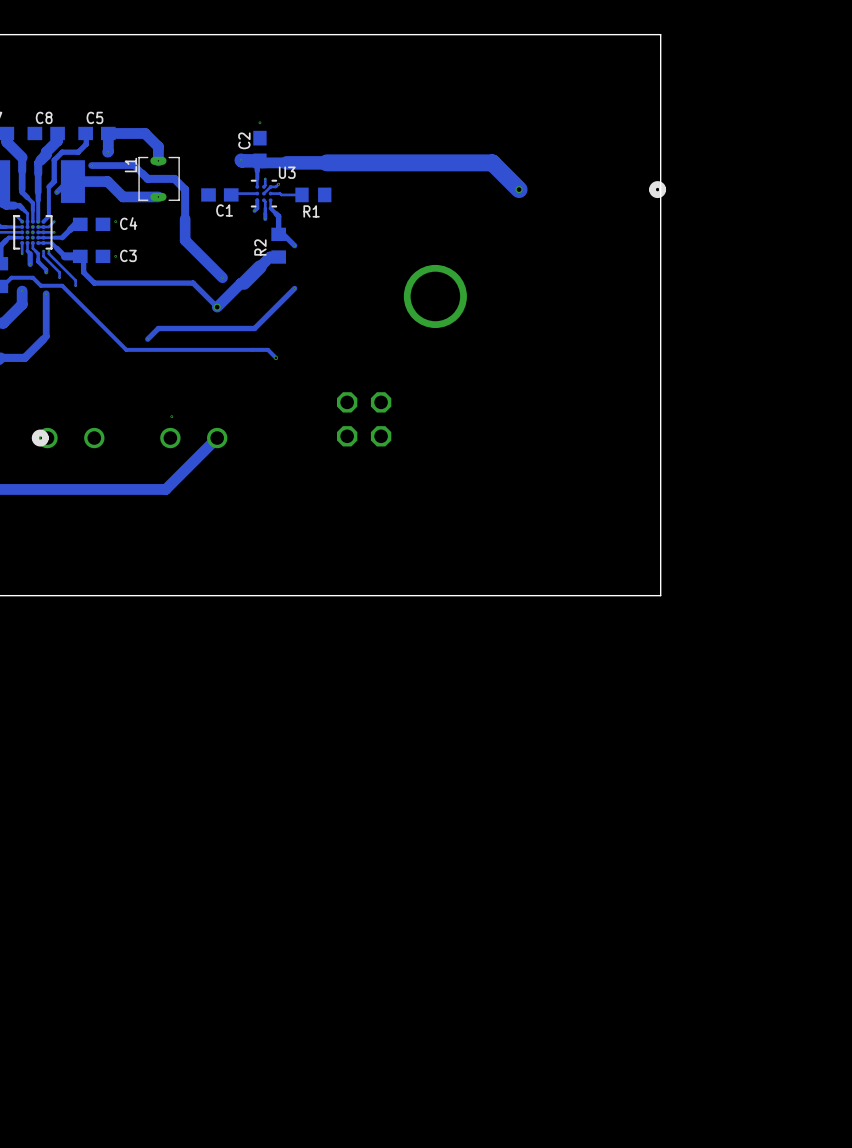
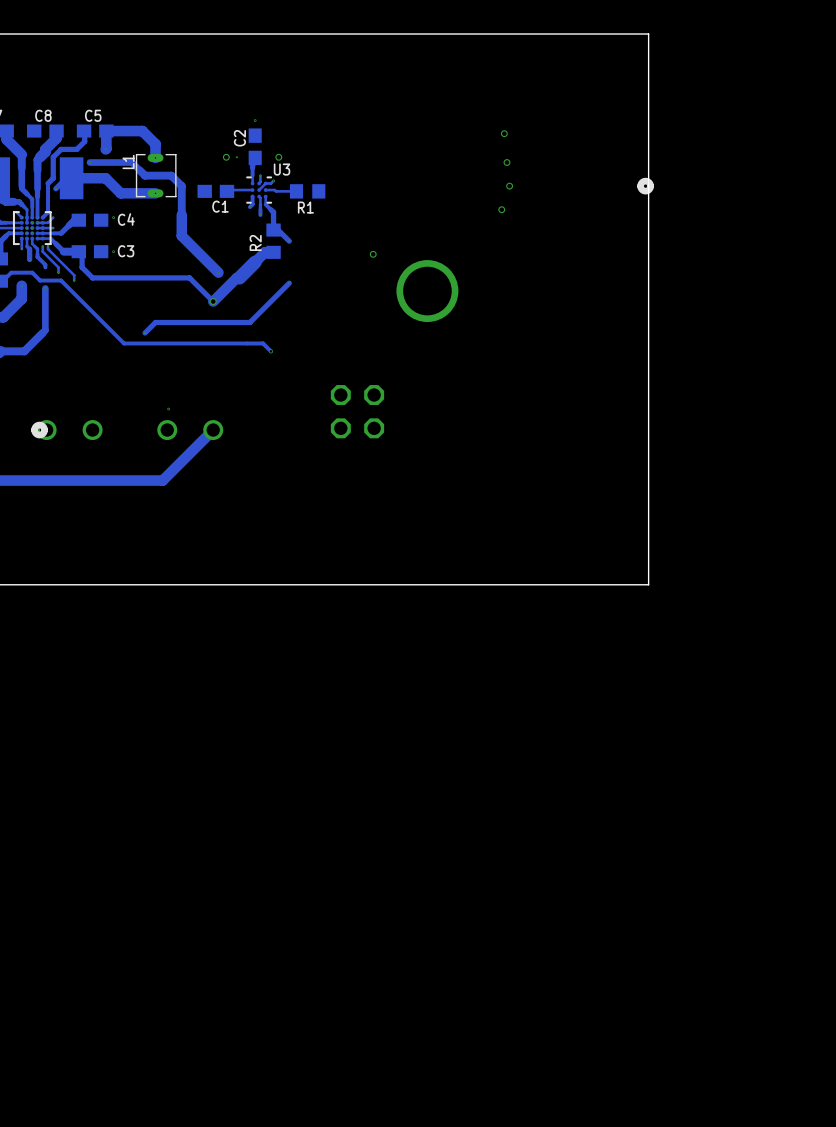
via: none -> (504, 133)
via: none -> (226, 157)
track: (241, 160) (259, 160) (261, 162) (492, 162) (519, 189) -> none
via: none -> (278, 157)
via: none -> (506, 162)
via: none -> (501, 209)
via: none -> (373, 254)

